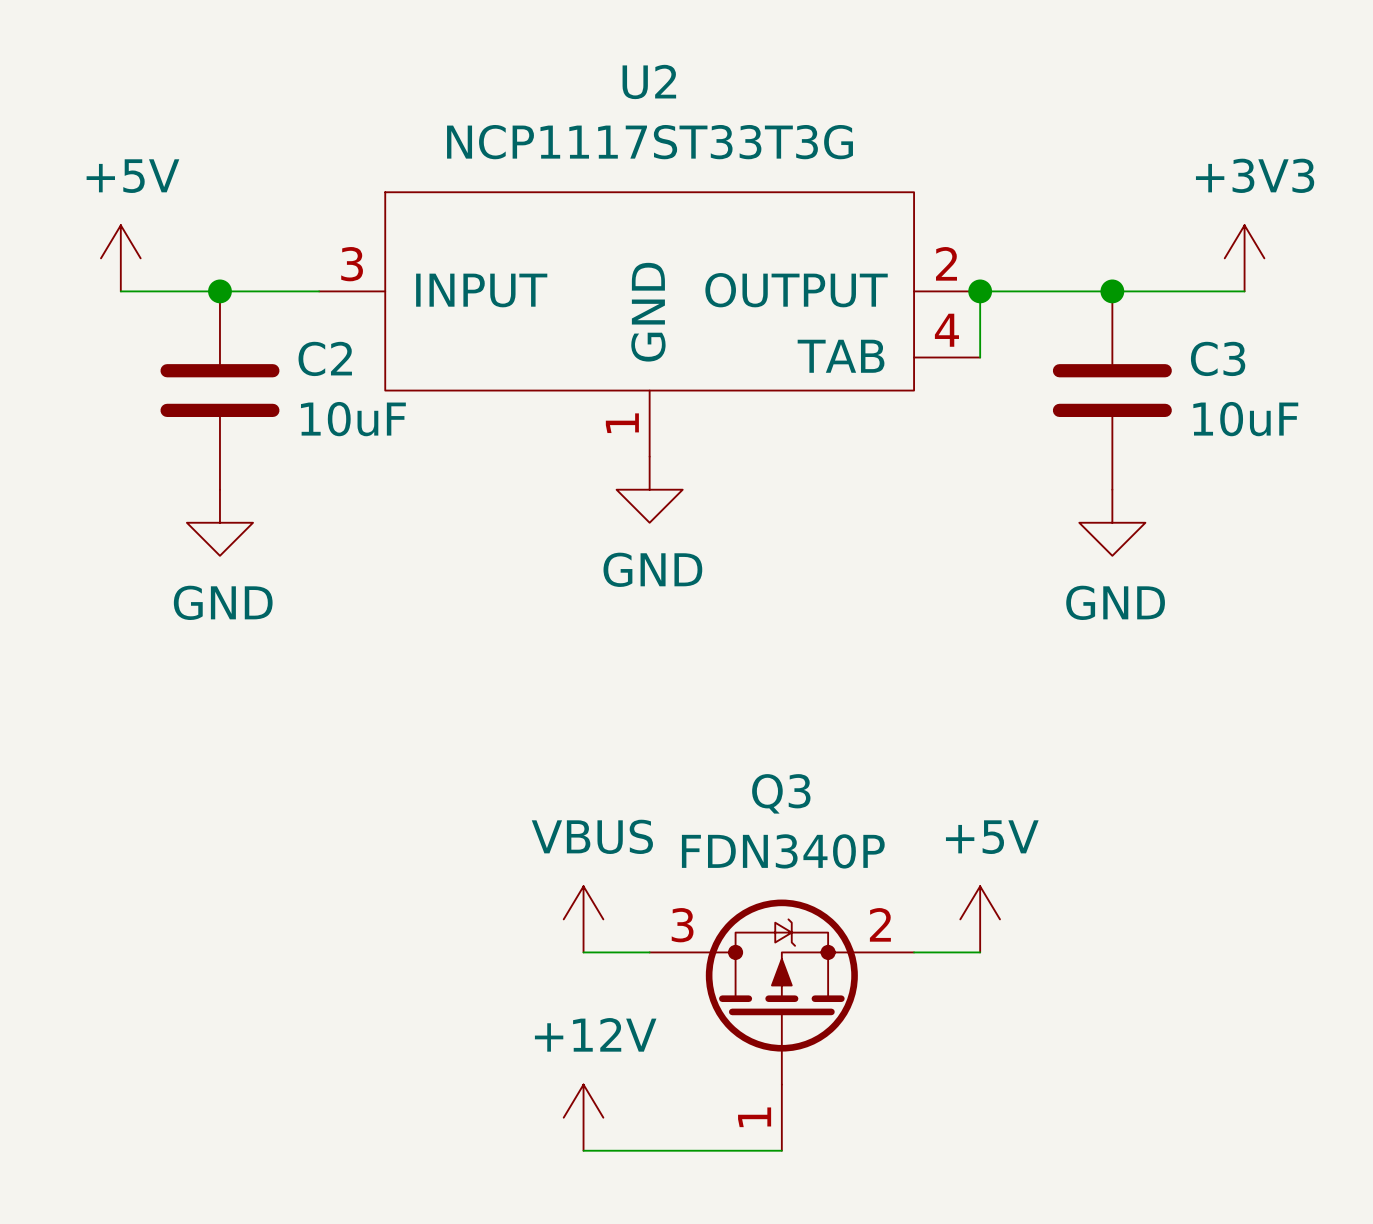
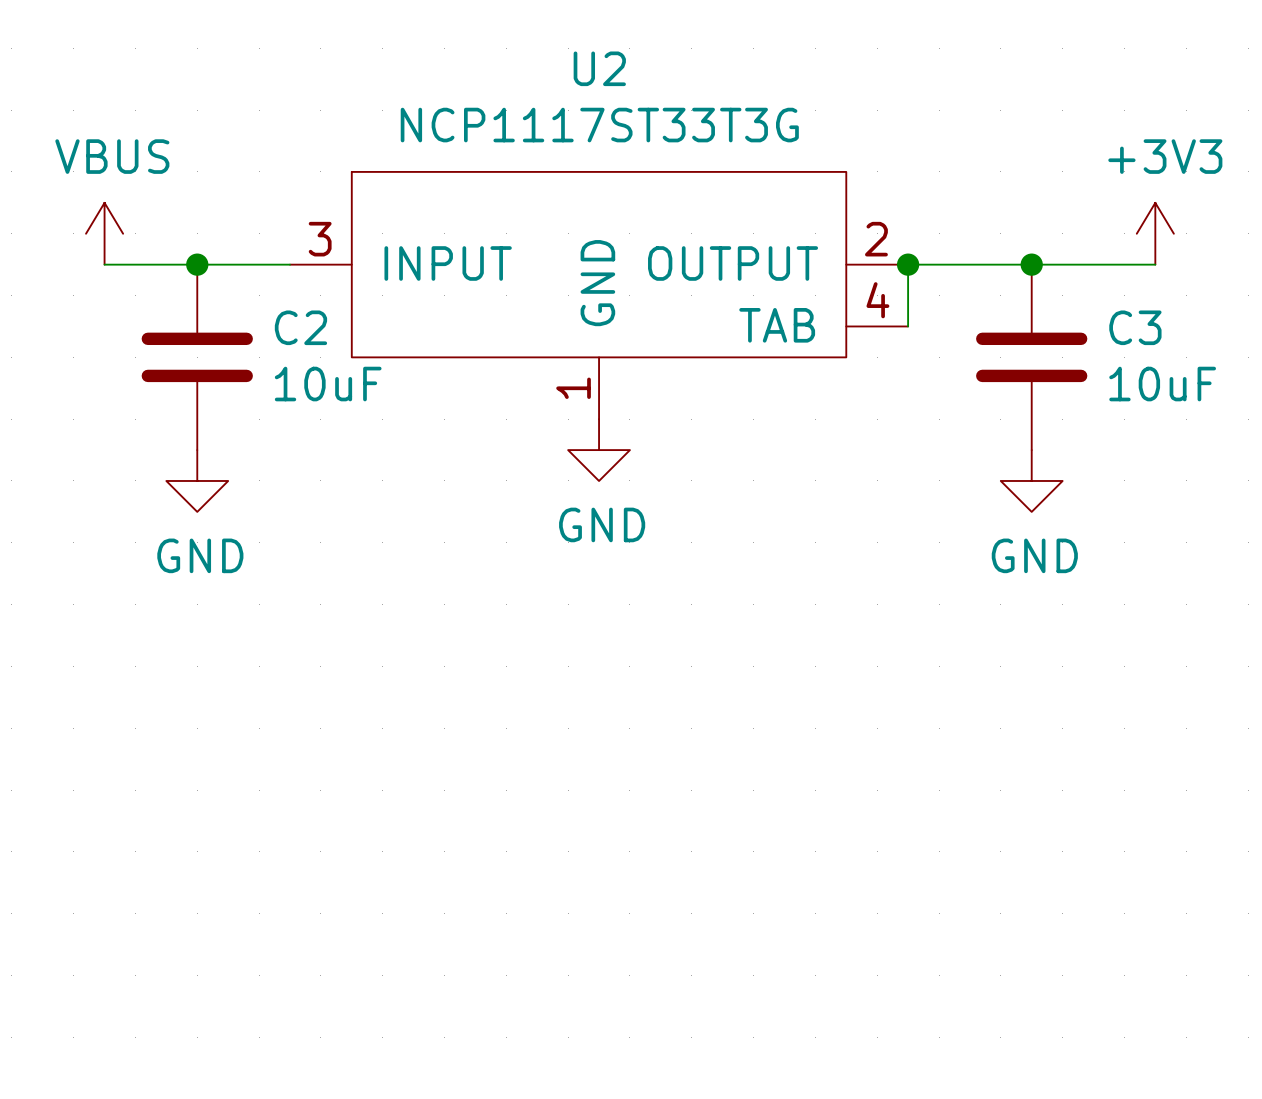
power symbol: +5V (120, 258) -> VBUS (104, 233)
power symbol: VBUS (583, 919) -> none
power symbol: +5V (980, 919) -> none
wire: (583, 952) (649, 952) -> none
wire: (914, 952) (980, 952) -> none
Q3: FDN340P (781, 1025) -> none
power symbol: +12V (583, 1117) -> none
wire: (583, 1150) (781, 1150) -> none

